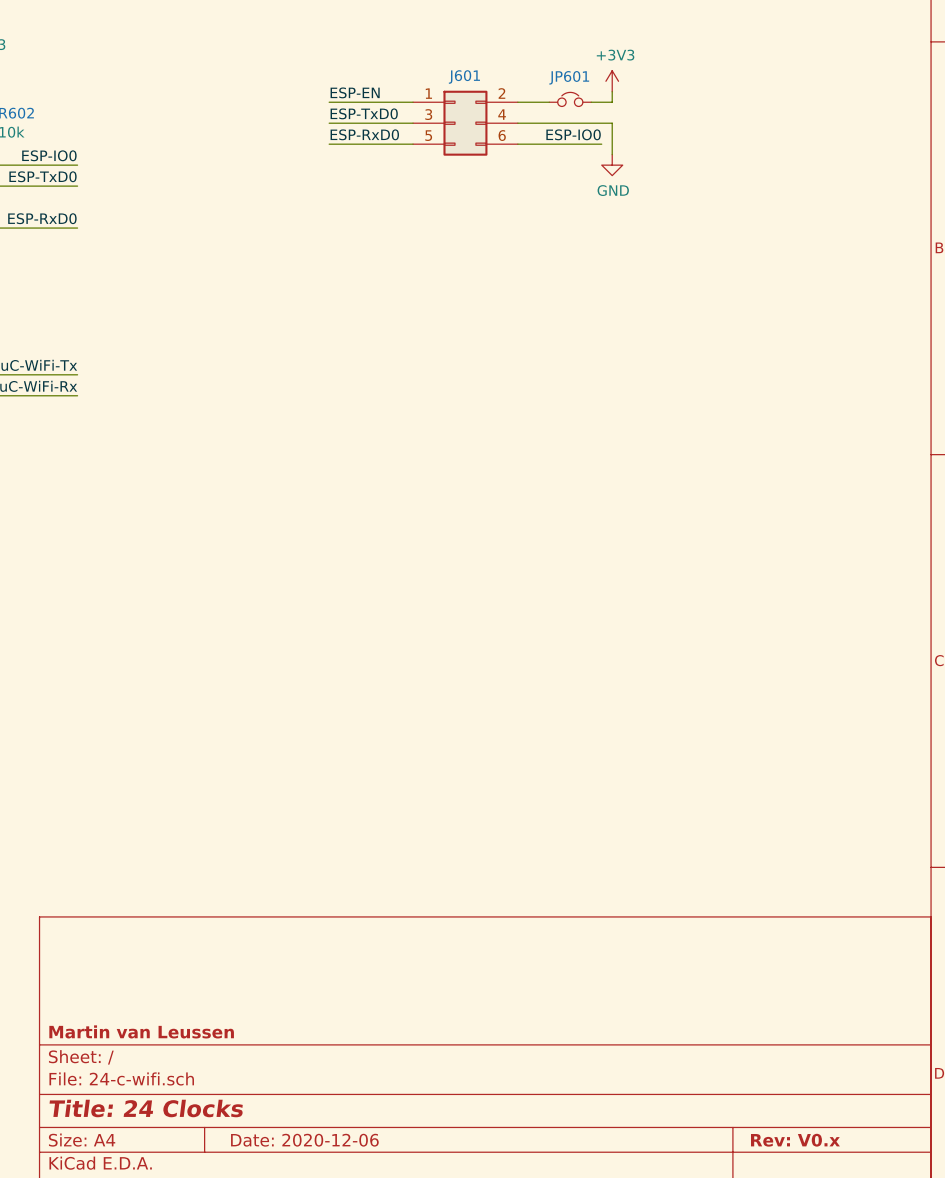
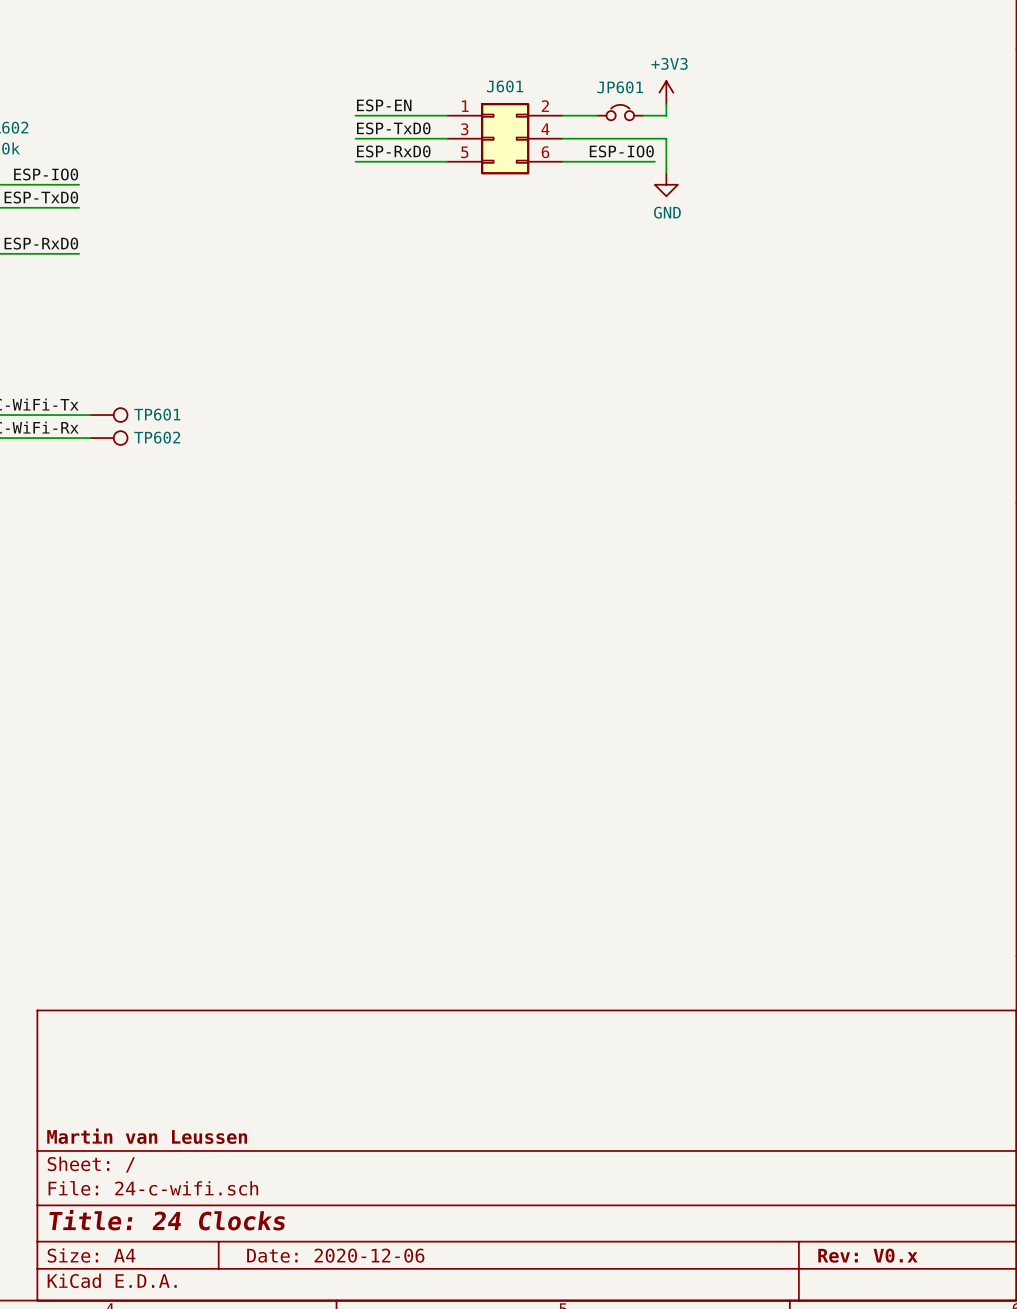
wire: none -> (79, 415) (90, 415)
TP601: none -> (109, 415)
wire: none -> (79, 438) (90, 438)
TP602: none -> (109, 438)

